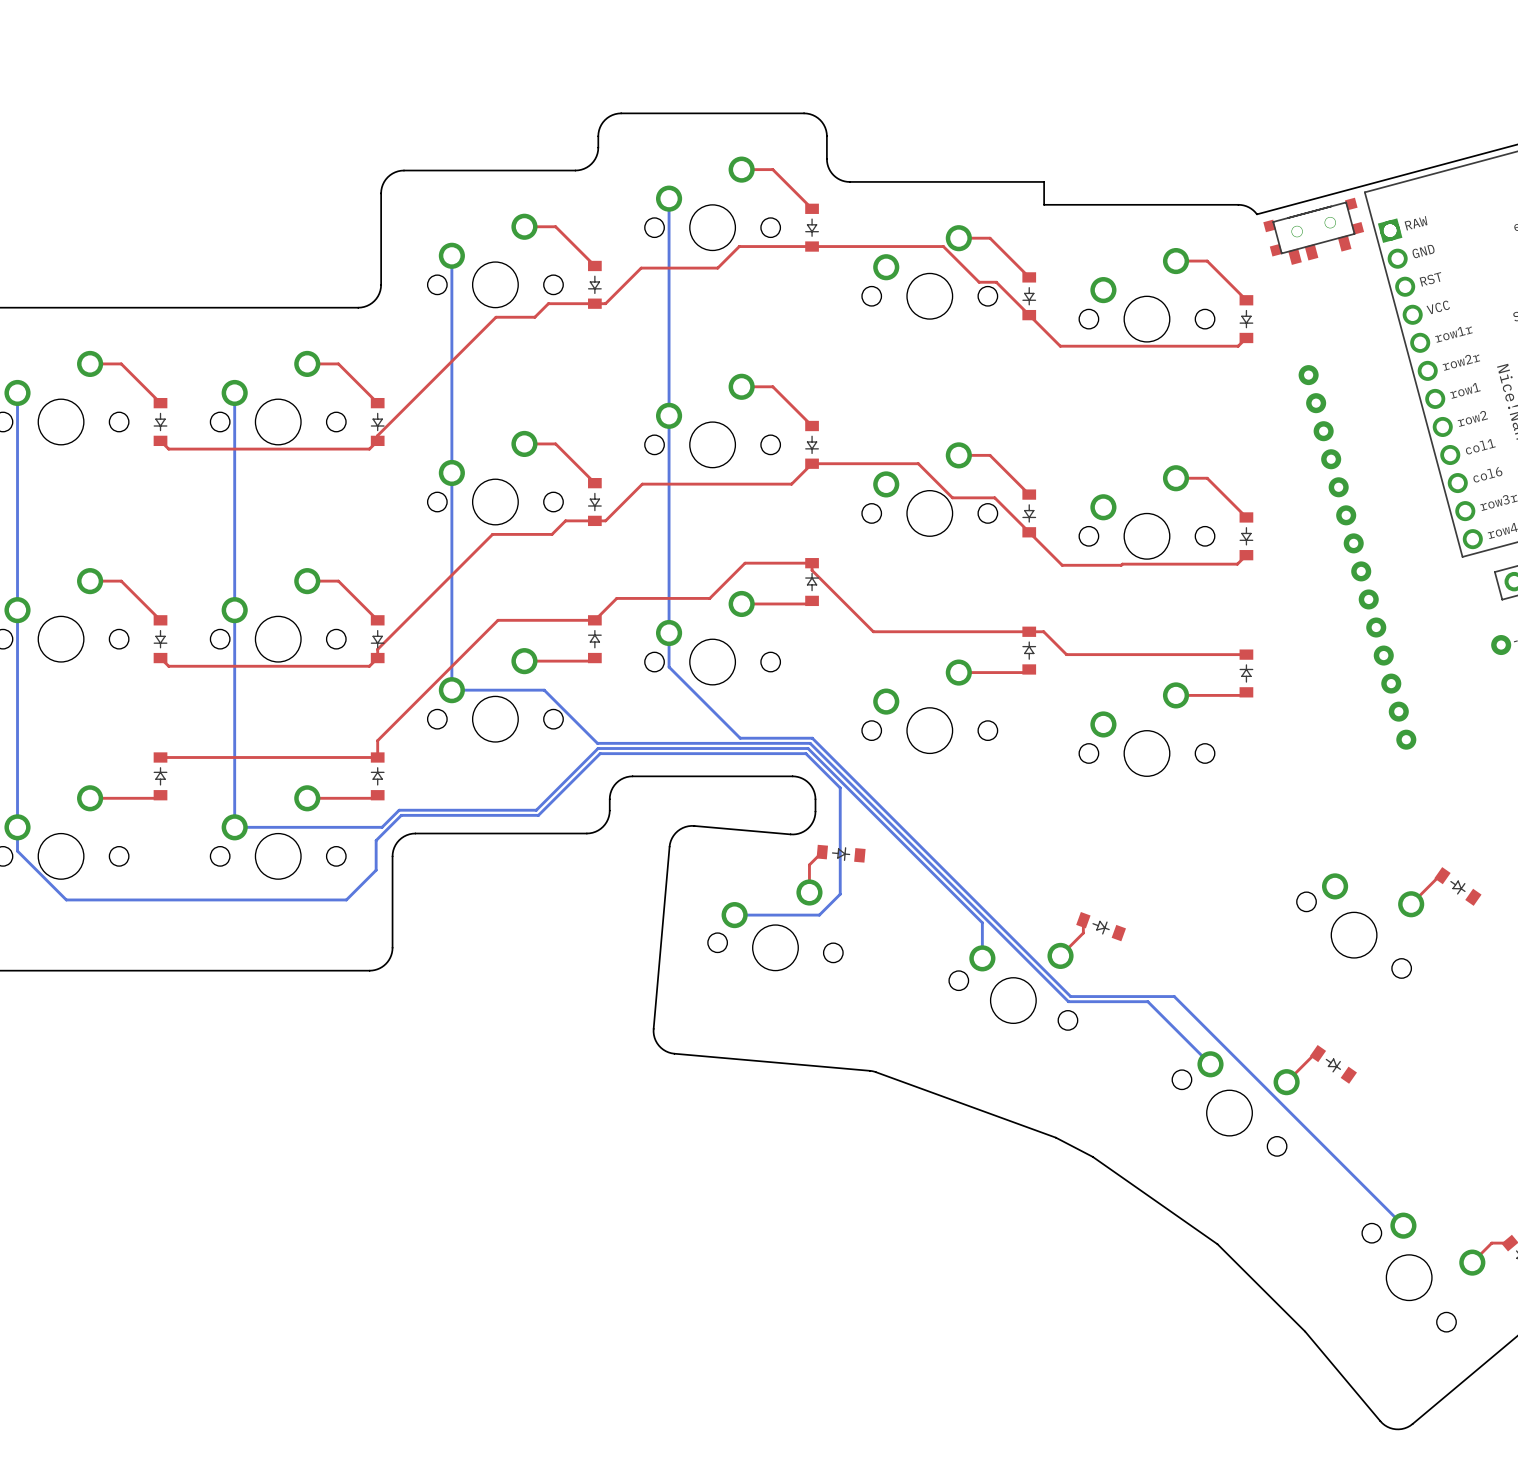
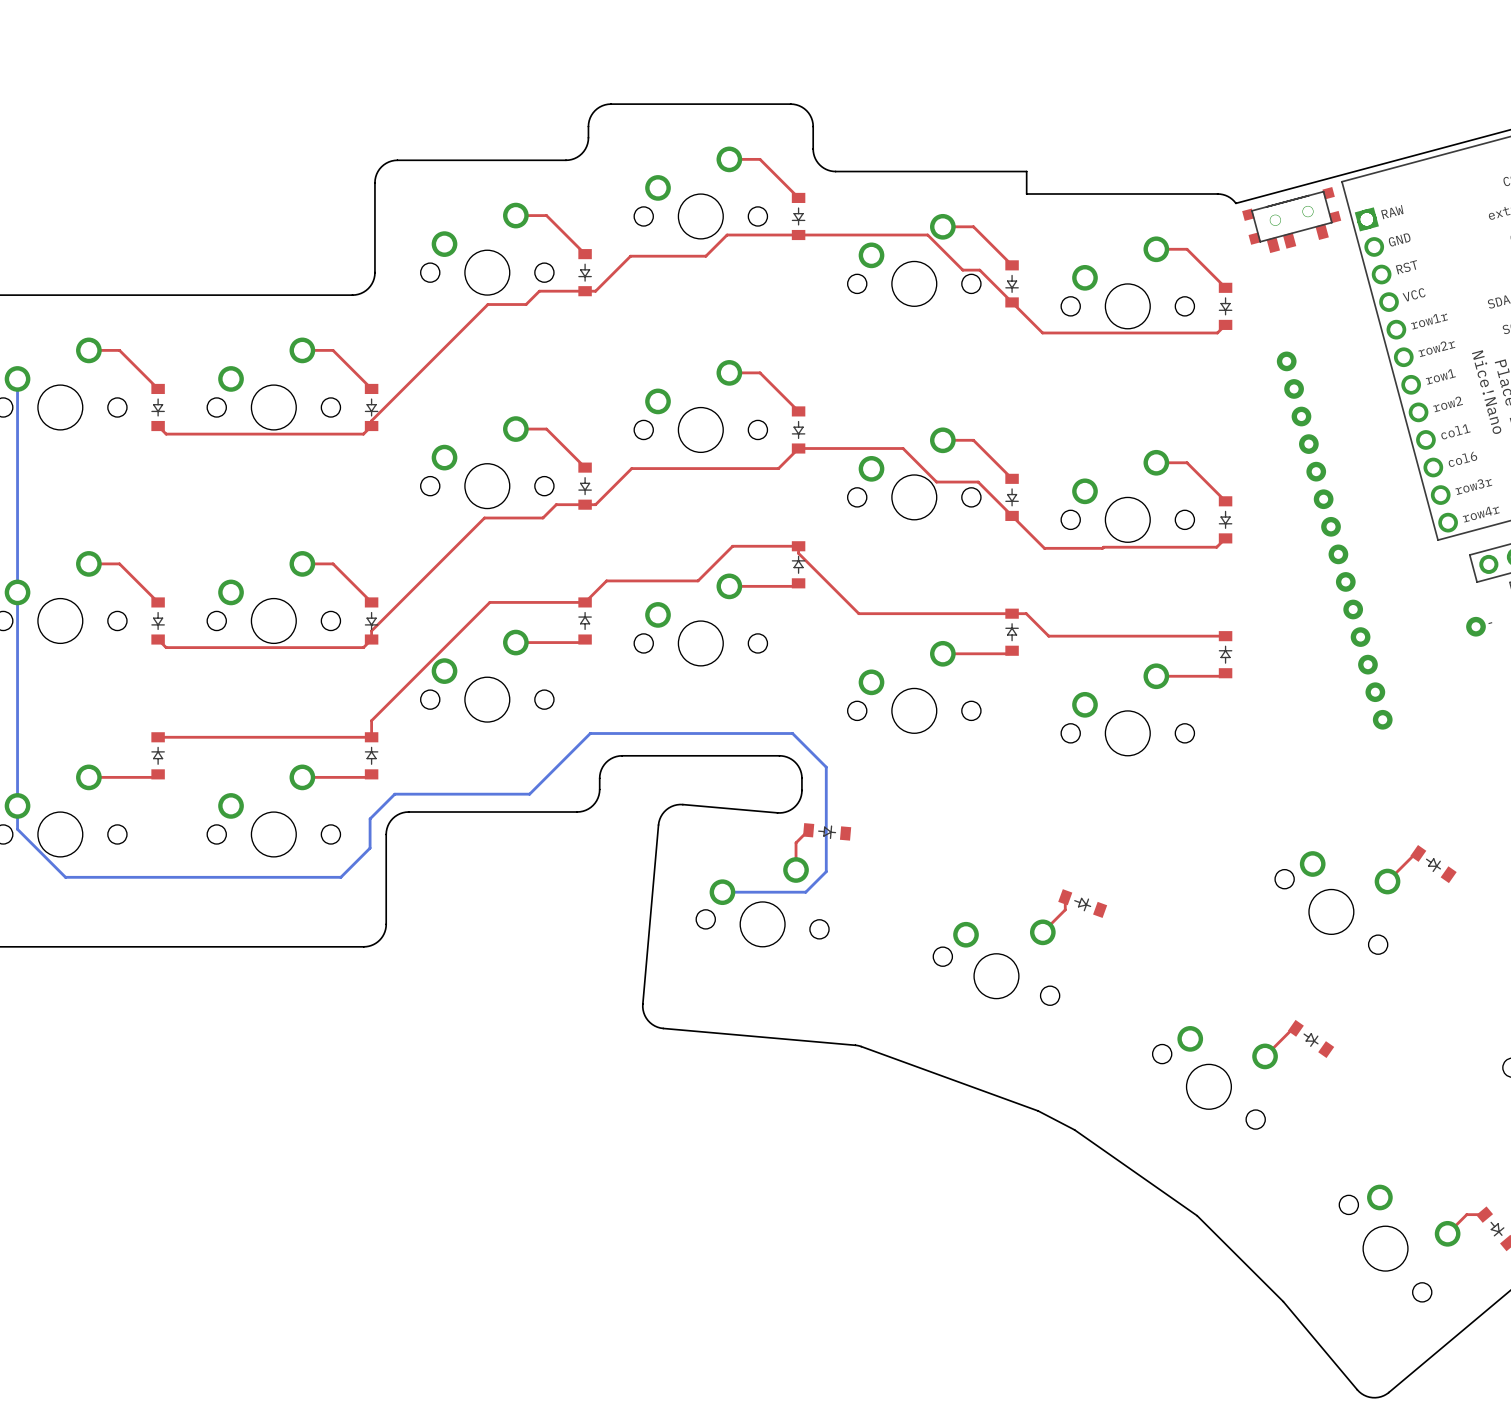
bottom track: (669, 198) (669, 667) (740, 738) (812, 738) (1070, 996) (1174, 996) (1403, 1225) -> none
bottom track: (451, 255) (451, 690) (544, 690) (597, 743) (810, 743) (1068, 1001) (1147, 1001) (1210, 1064) -> none
bottom track: (234, 392) (234, 827) (382, 827) (399, 810) (536, 810) (598, 748) (808, 748) (982, 922) (982, 958) -> none

